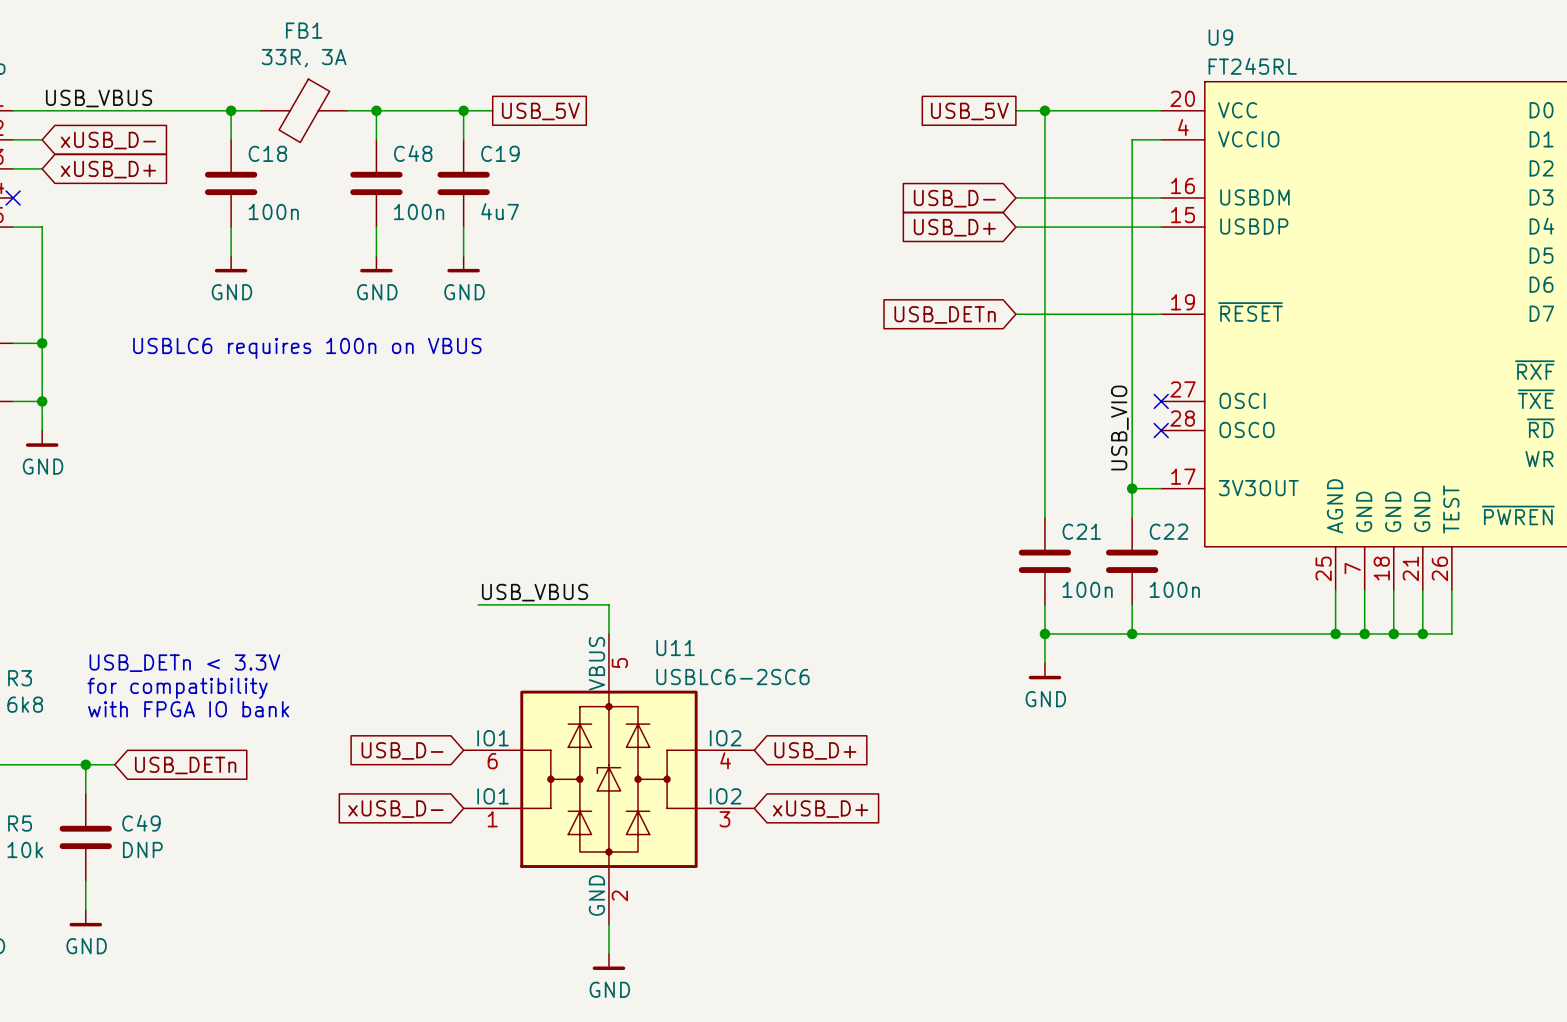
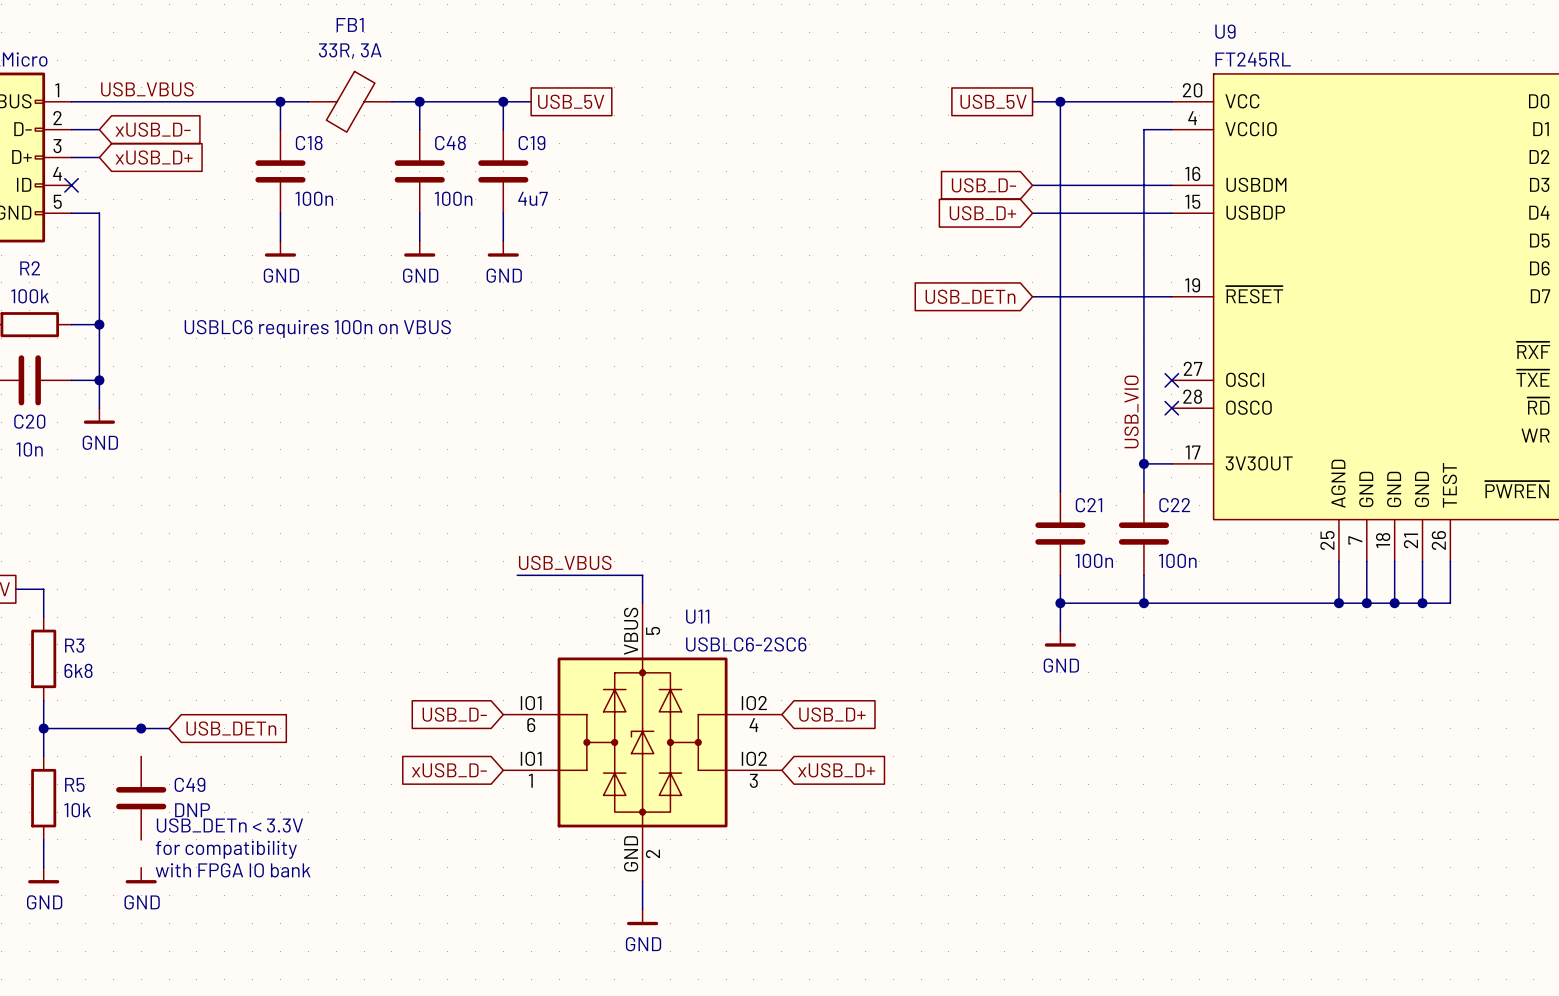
text position: USB_DETn < 3.3V (184, 663) -> USB_DETn < 3.3V (229, 825)
text position: for compatibility (177, 688) -> for compatibility (226, 849)
text position: with FPGA IO bank (188, 709) -> with FPGA IO bank (233, 870)
wire: (85, 764) (85, 793) -> none
wire: (85, 881) (85, 910) -> none

